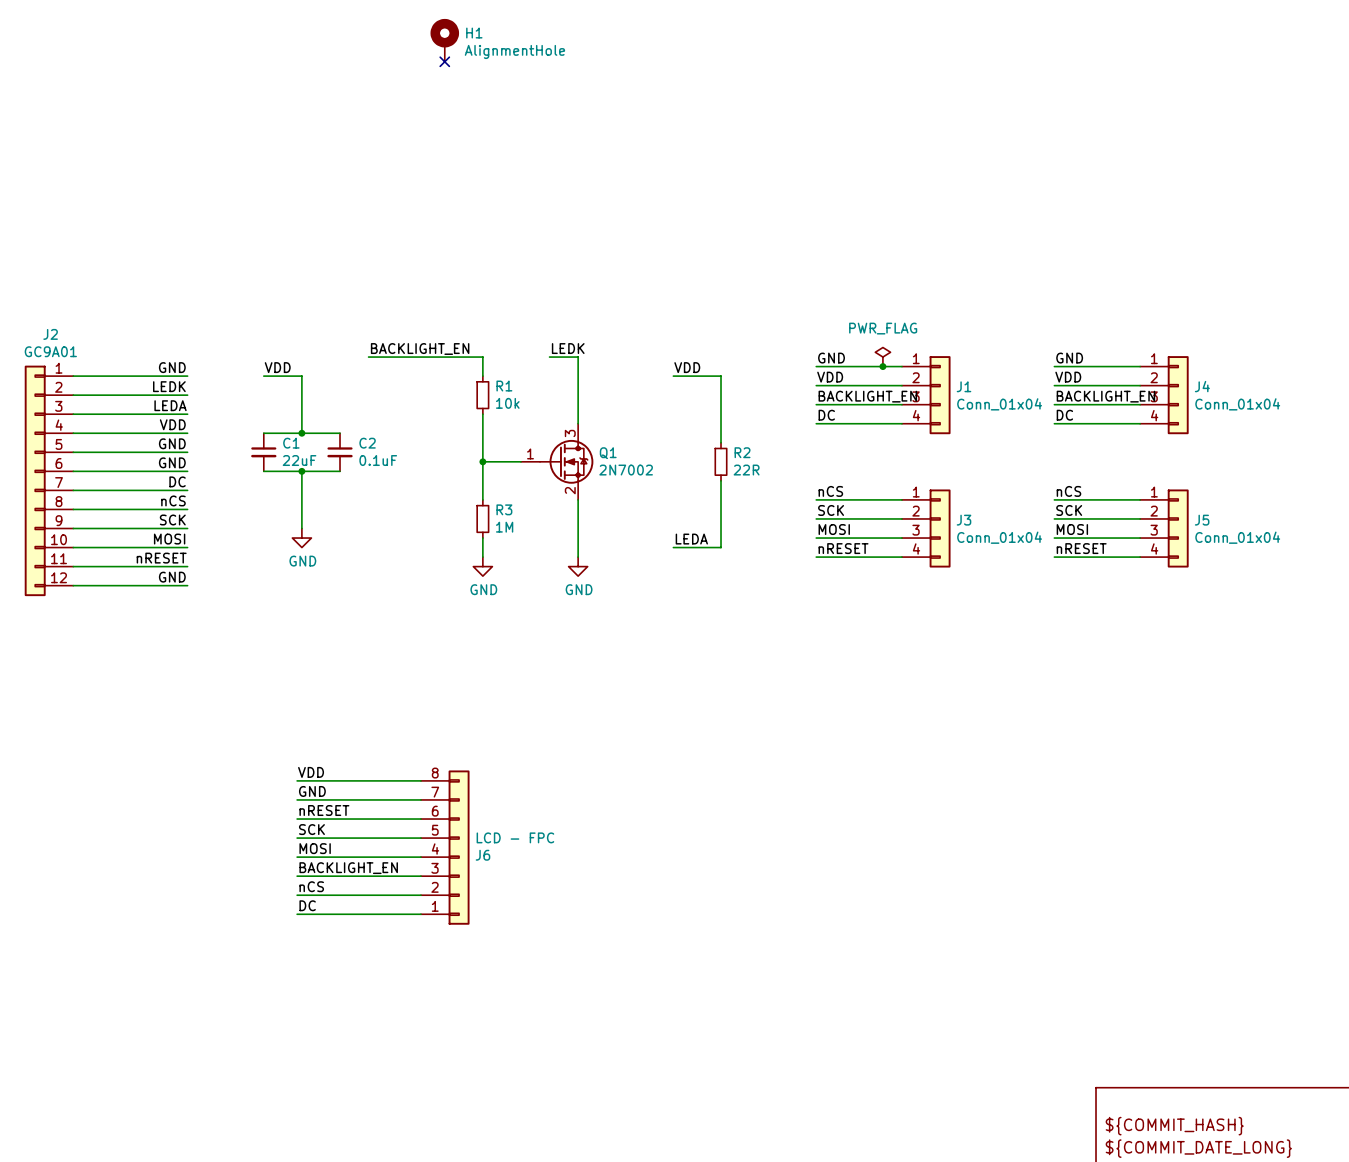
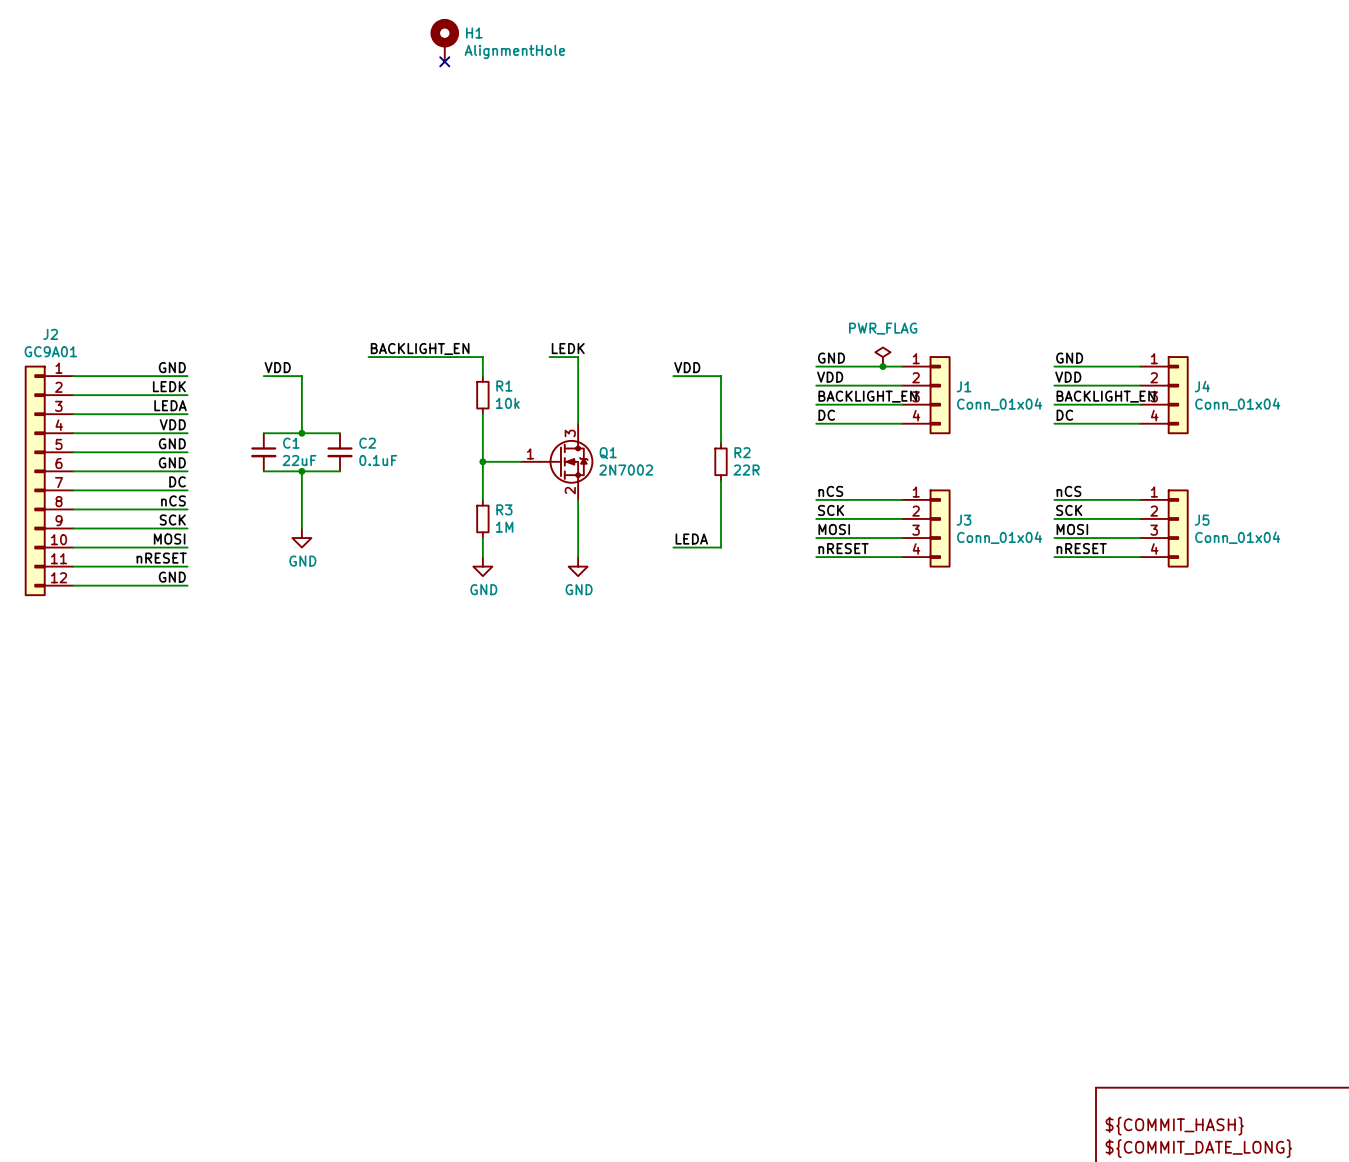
label: VDD (311, 772) -> none
wire: (297, 780) (420, 780) -> none
label: GND (312, 791) -> none
wire: (297, 799) (420, 799) -> none
label: nRESET (324, 810) -> none
wire: (297, 819) (420, 819) -> none
label: SCK (311, 829) -> none
wire: (297, 838) (420, 838) -> none
J6: LCD - FPC (445, 847) -> none
label: MOSI (315, 848) -> none
wire: (297, 857) (420, 857) -> none
label: BACKLIGHT_EN (348, 868) -> none
wire: (297, 876) (420, 876) -> none
label: nCS (311, 886) -> none
wire: (297, 895) (420, 895) -> none
label: DC (307, 905) -> none
wire: (297, 914) (420, 914) -> none

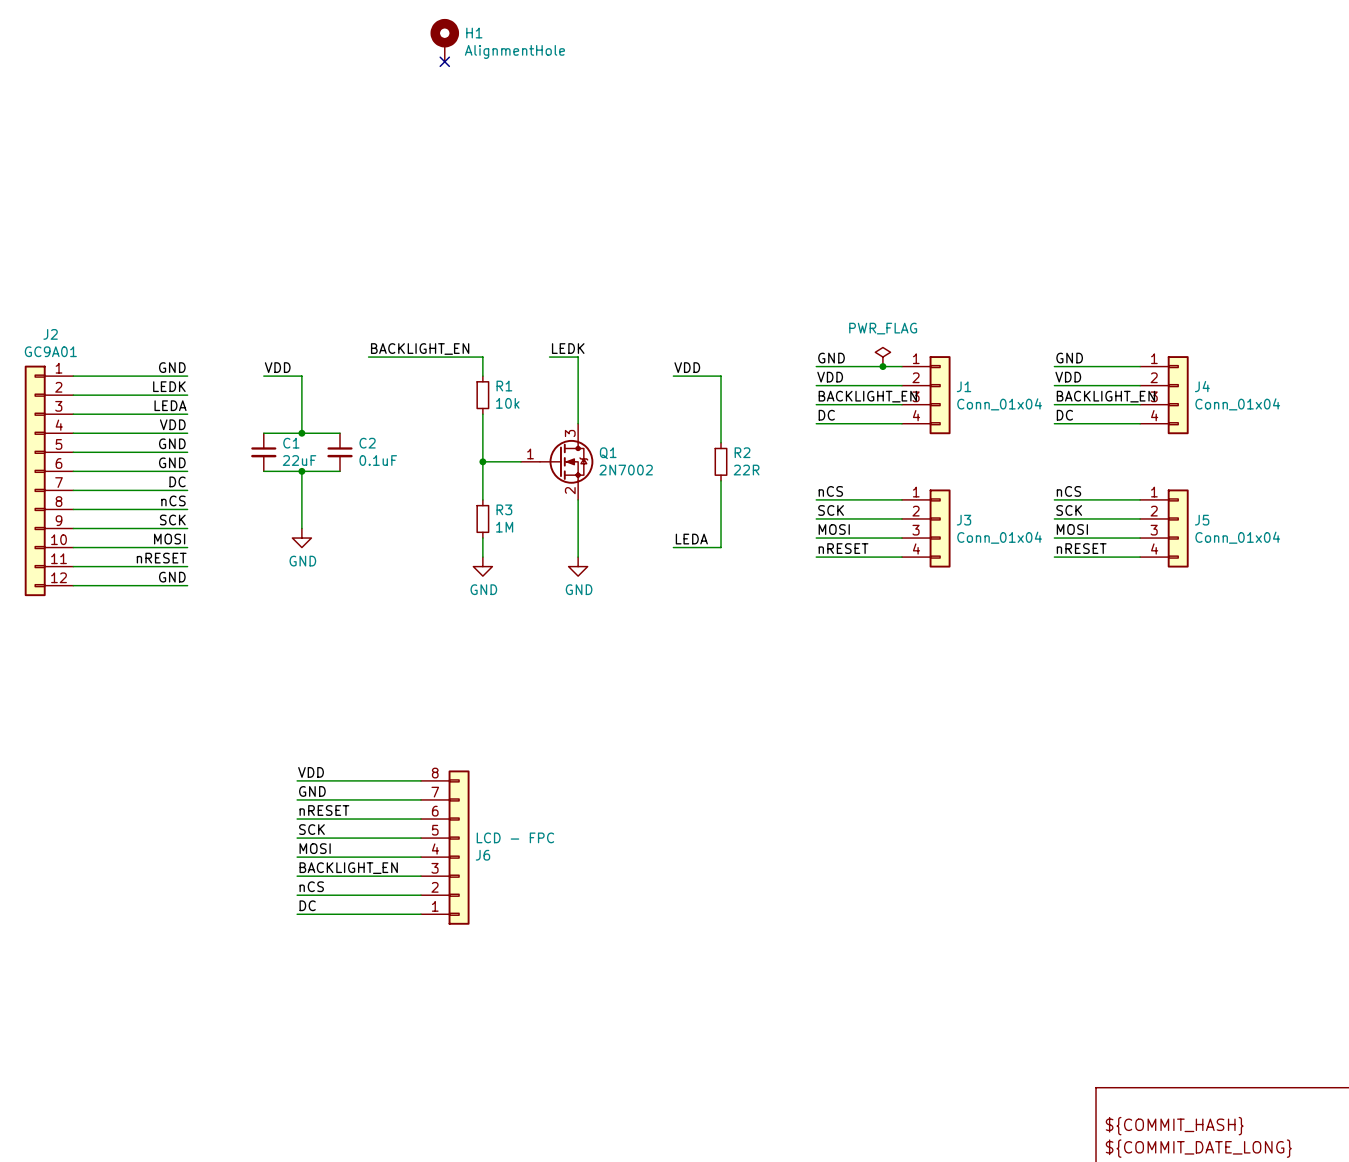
label: none -> VDD (311, 772)
wire: none -> (297, 780) (420, 780)
label: none -> GND (312, 791)
wire: none -> (297, 799) (420, 799)
label: none -> nRESET (324, 810)
wire: none -> (297, 819) (420, 819)
label: none -> SCK (311, 829)
wire: none -> (297, 838) (420, 838)
J6: none -> LCD - FPC (445, 847)
label: none -> MOSI (315, 848)
wire: none -> (297, 857) (420, 857)
label: none -> BACKLIGHT_EN (348, 868)
wire: none -> (297, 876) (420, 876)
label: none -> nCS (311, 886)
wire: none -> (297, 895) (420, 895)
label: none -> DC (307, 905)
wire: none -> (297, 914) (420, 914)

